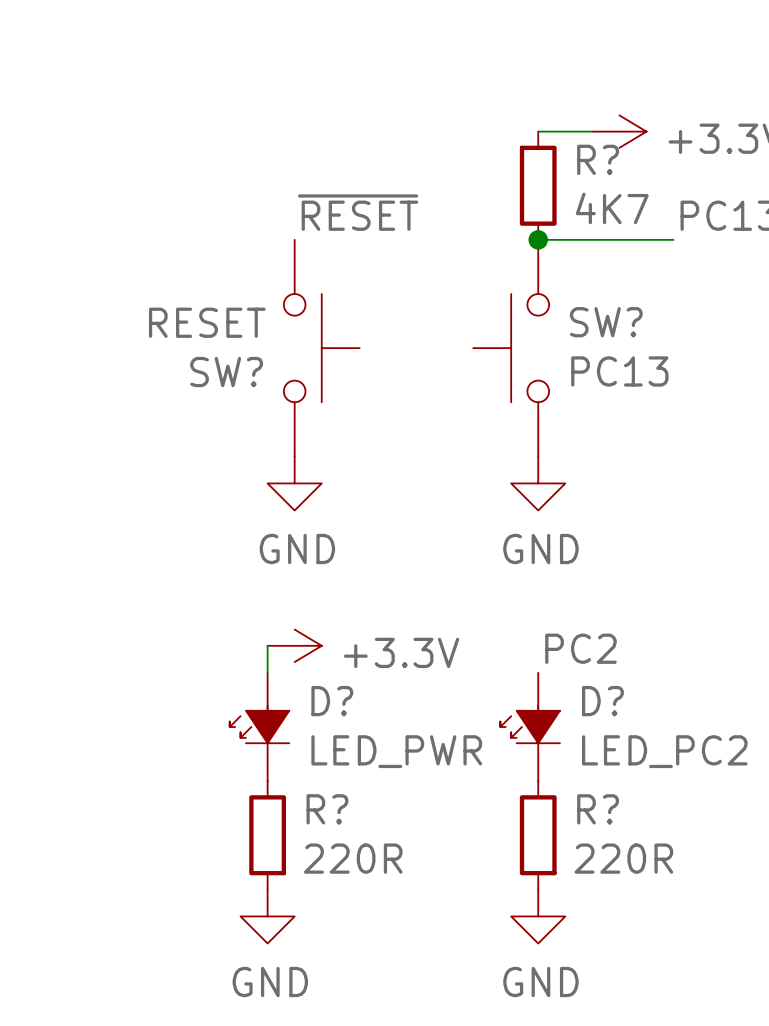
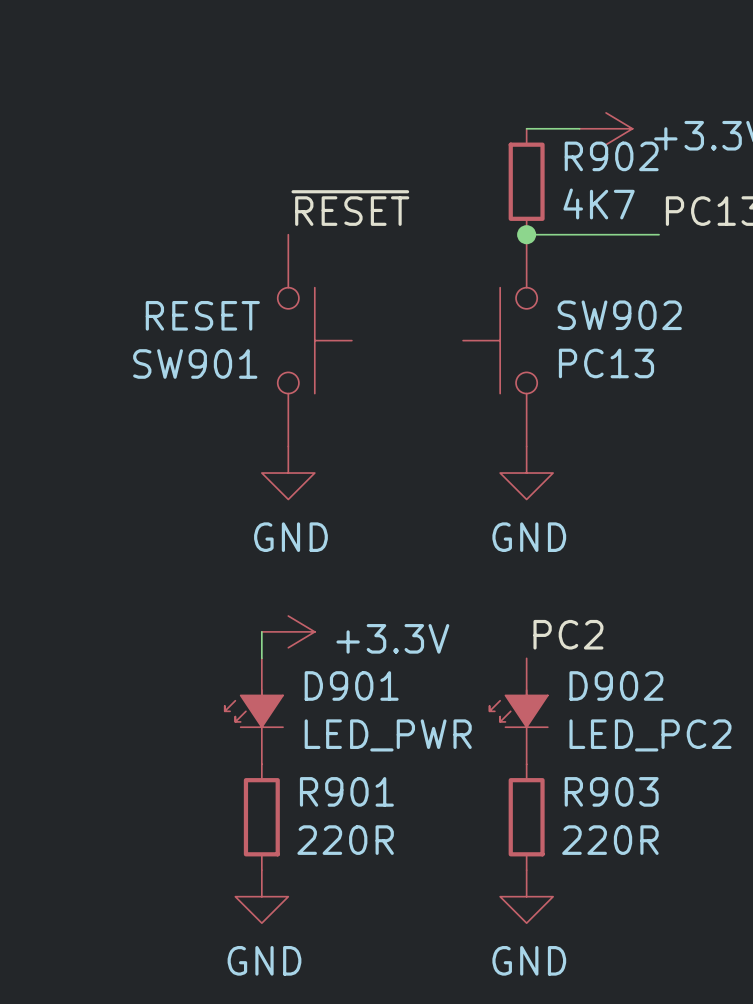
R? name: R? (598, 159) -> R902 (611, 156)
SW? name: SW? (606, 322) -> SW902 (619, 315)
SW? name: SW? (226, 372) -> SW901 (195, 363)
D? name: D? (332, 701) -> D901 (351, 685)
D? name: D? (602, 701) -> D902 (616, 685)
R? name: R? (327, 809) -> R901 (346, 791)
R? name: R? (598, 809) -> R903 (611, 791)

